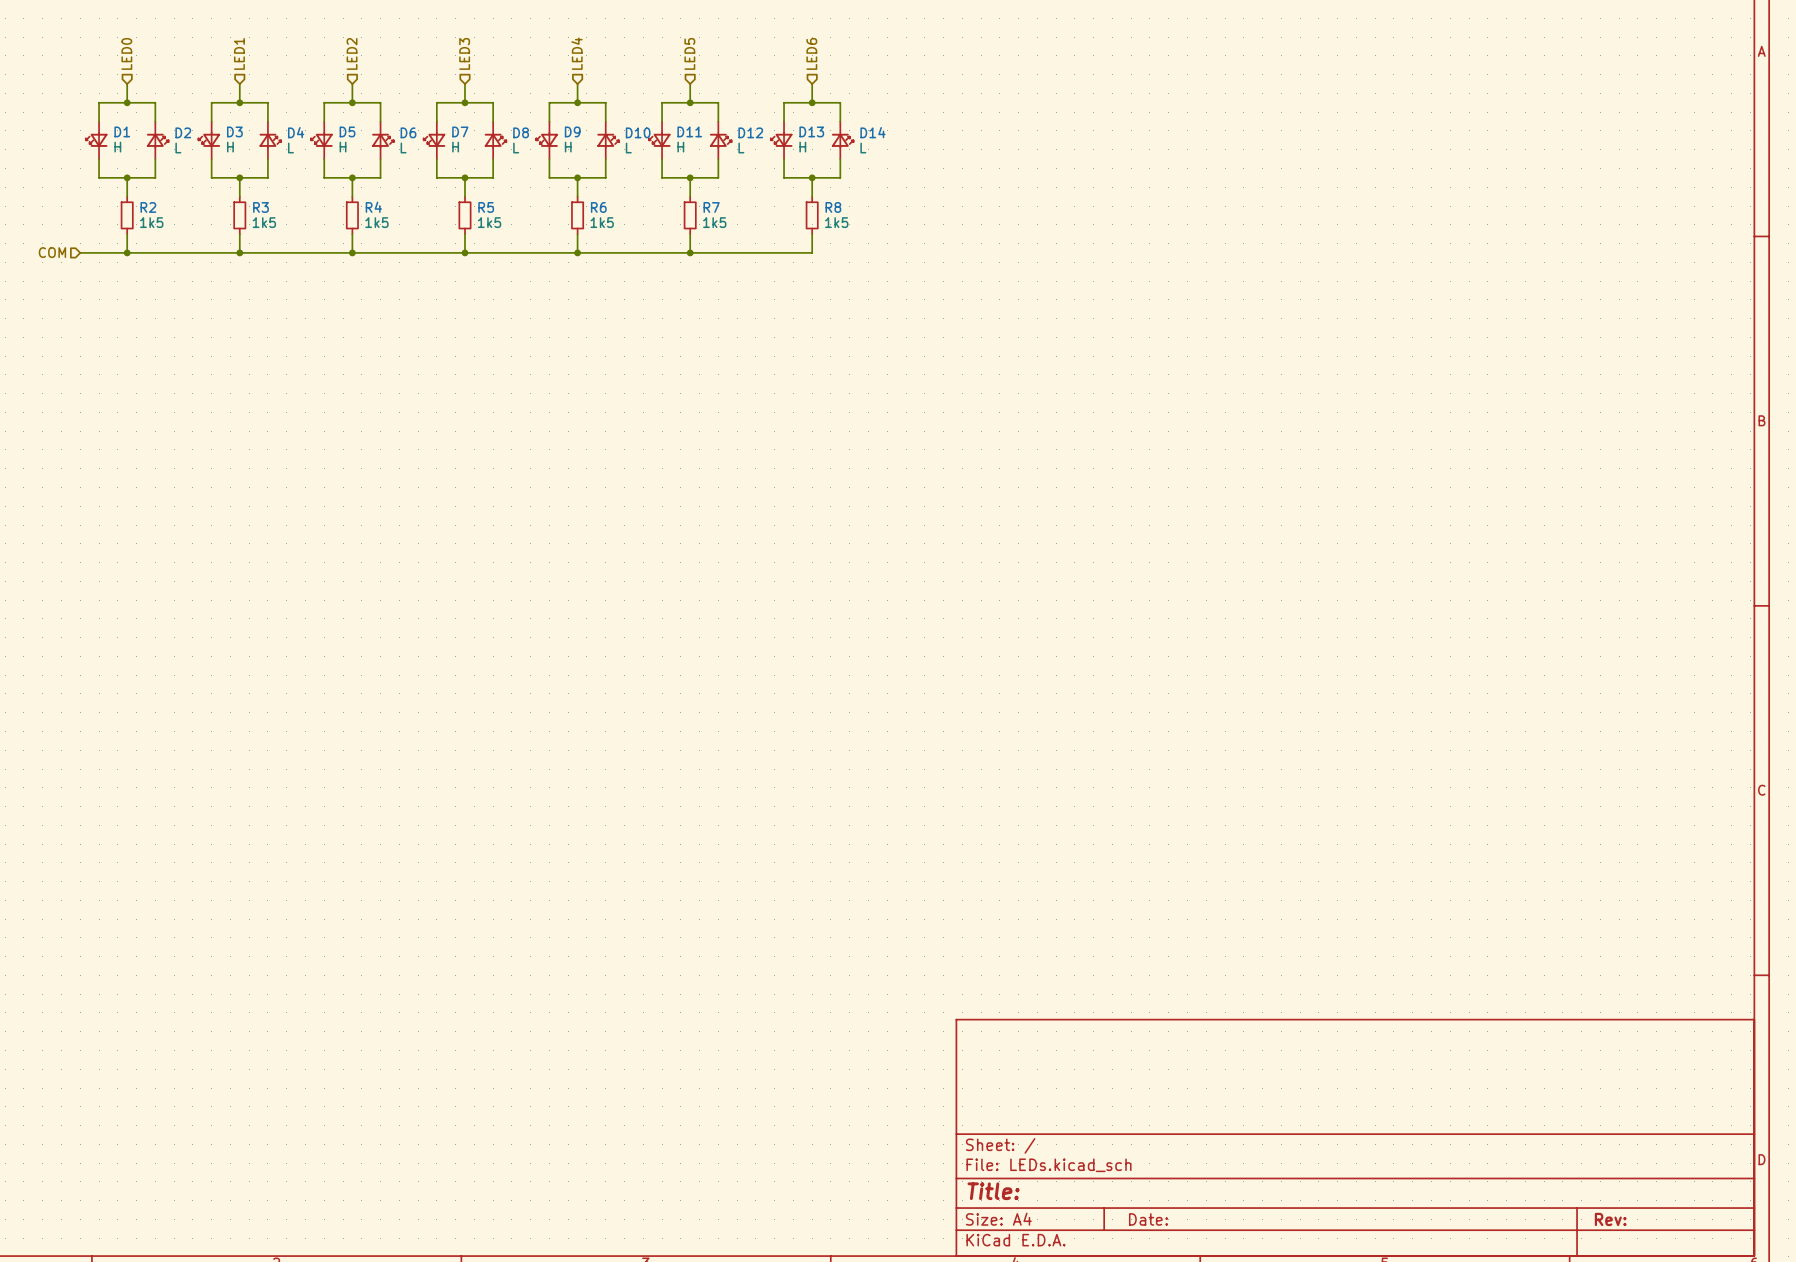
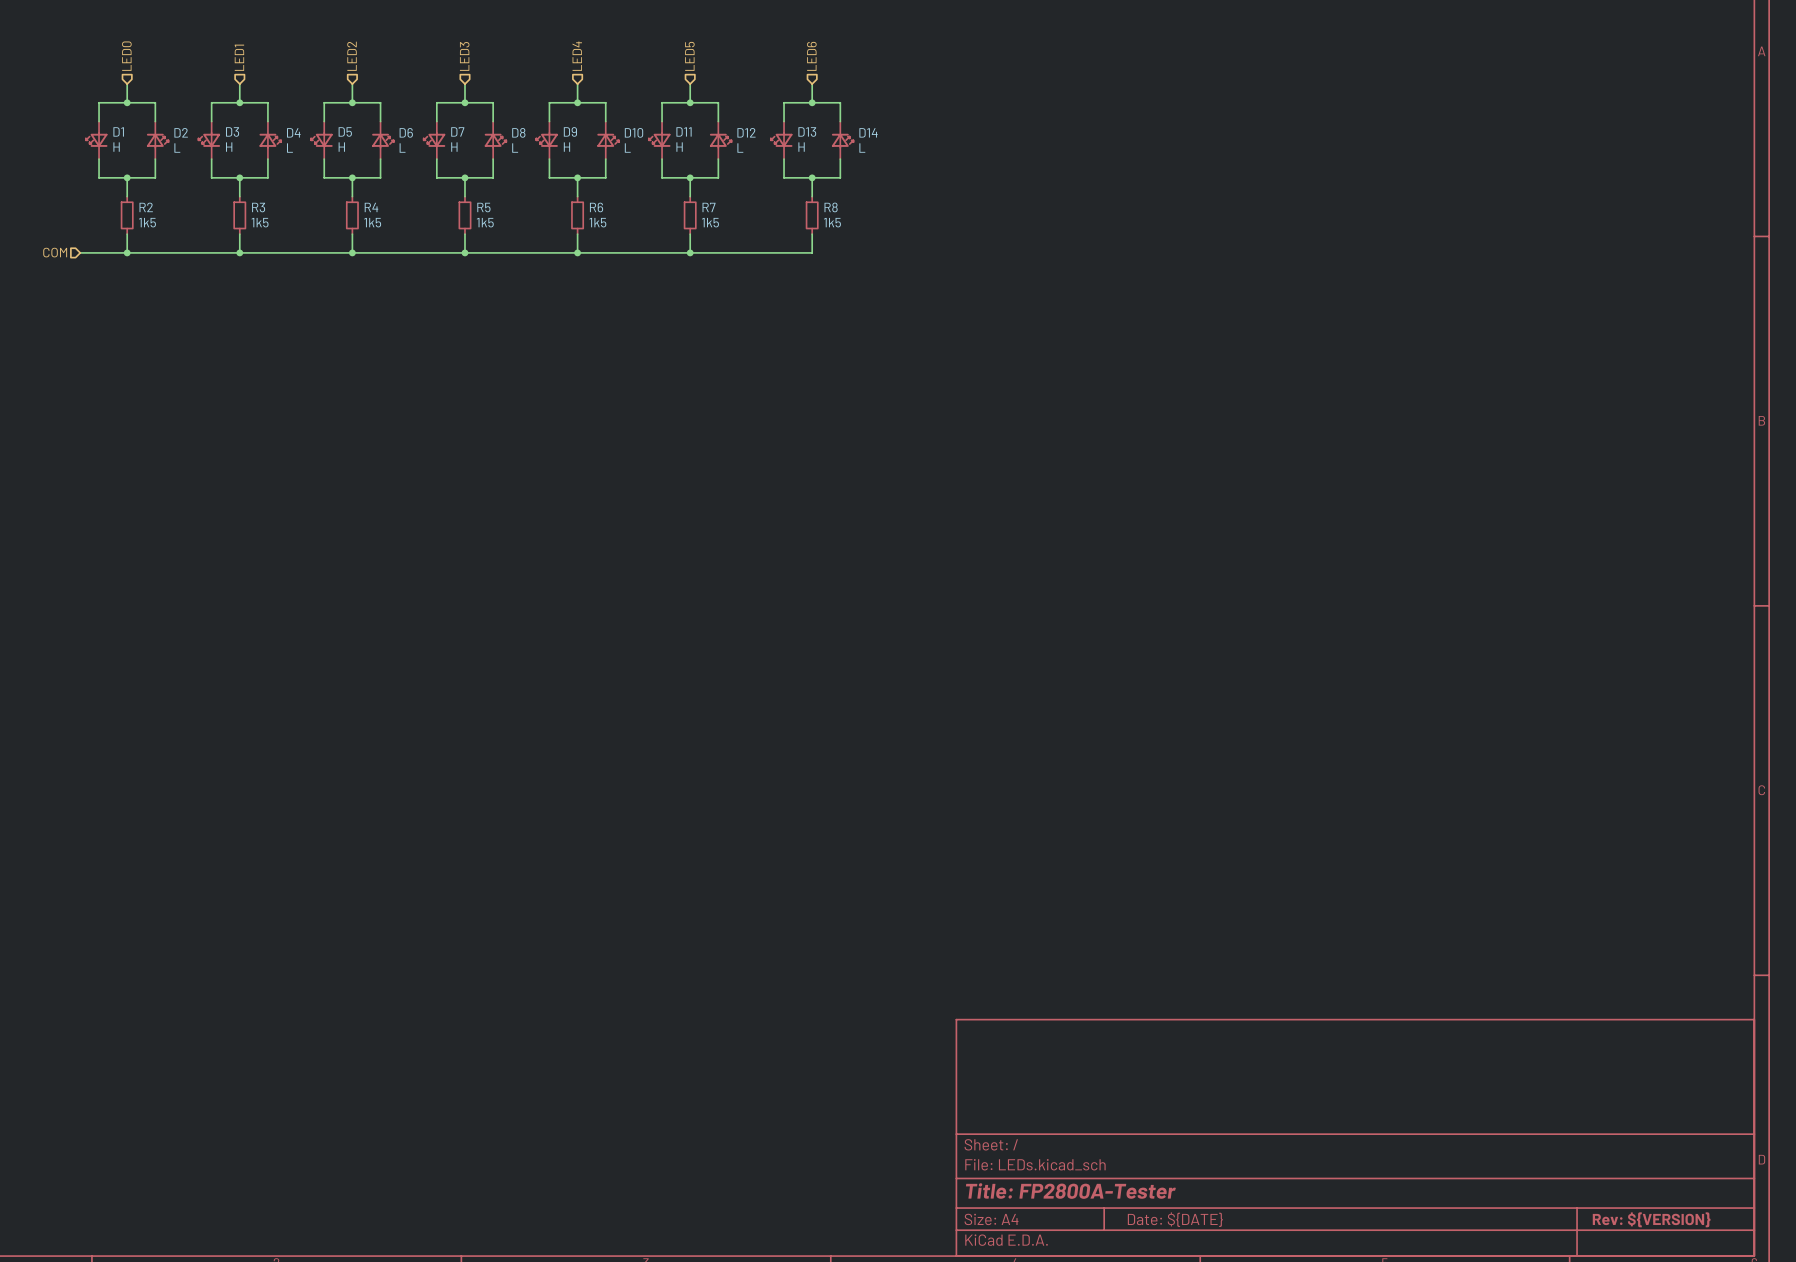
title block: Title: (993, 1191) -> Title: FP2800A-Tester (1070, 1191)
title block: Date: (1148, 1219) -> Date: ${DATE} (1175, 1219)
title block: Rev: (1610, 1219) -> Rev: ${VERSION} (1651, 1219)

